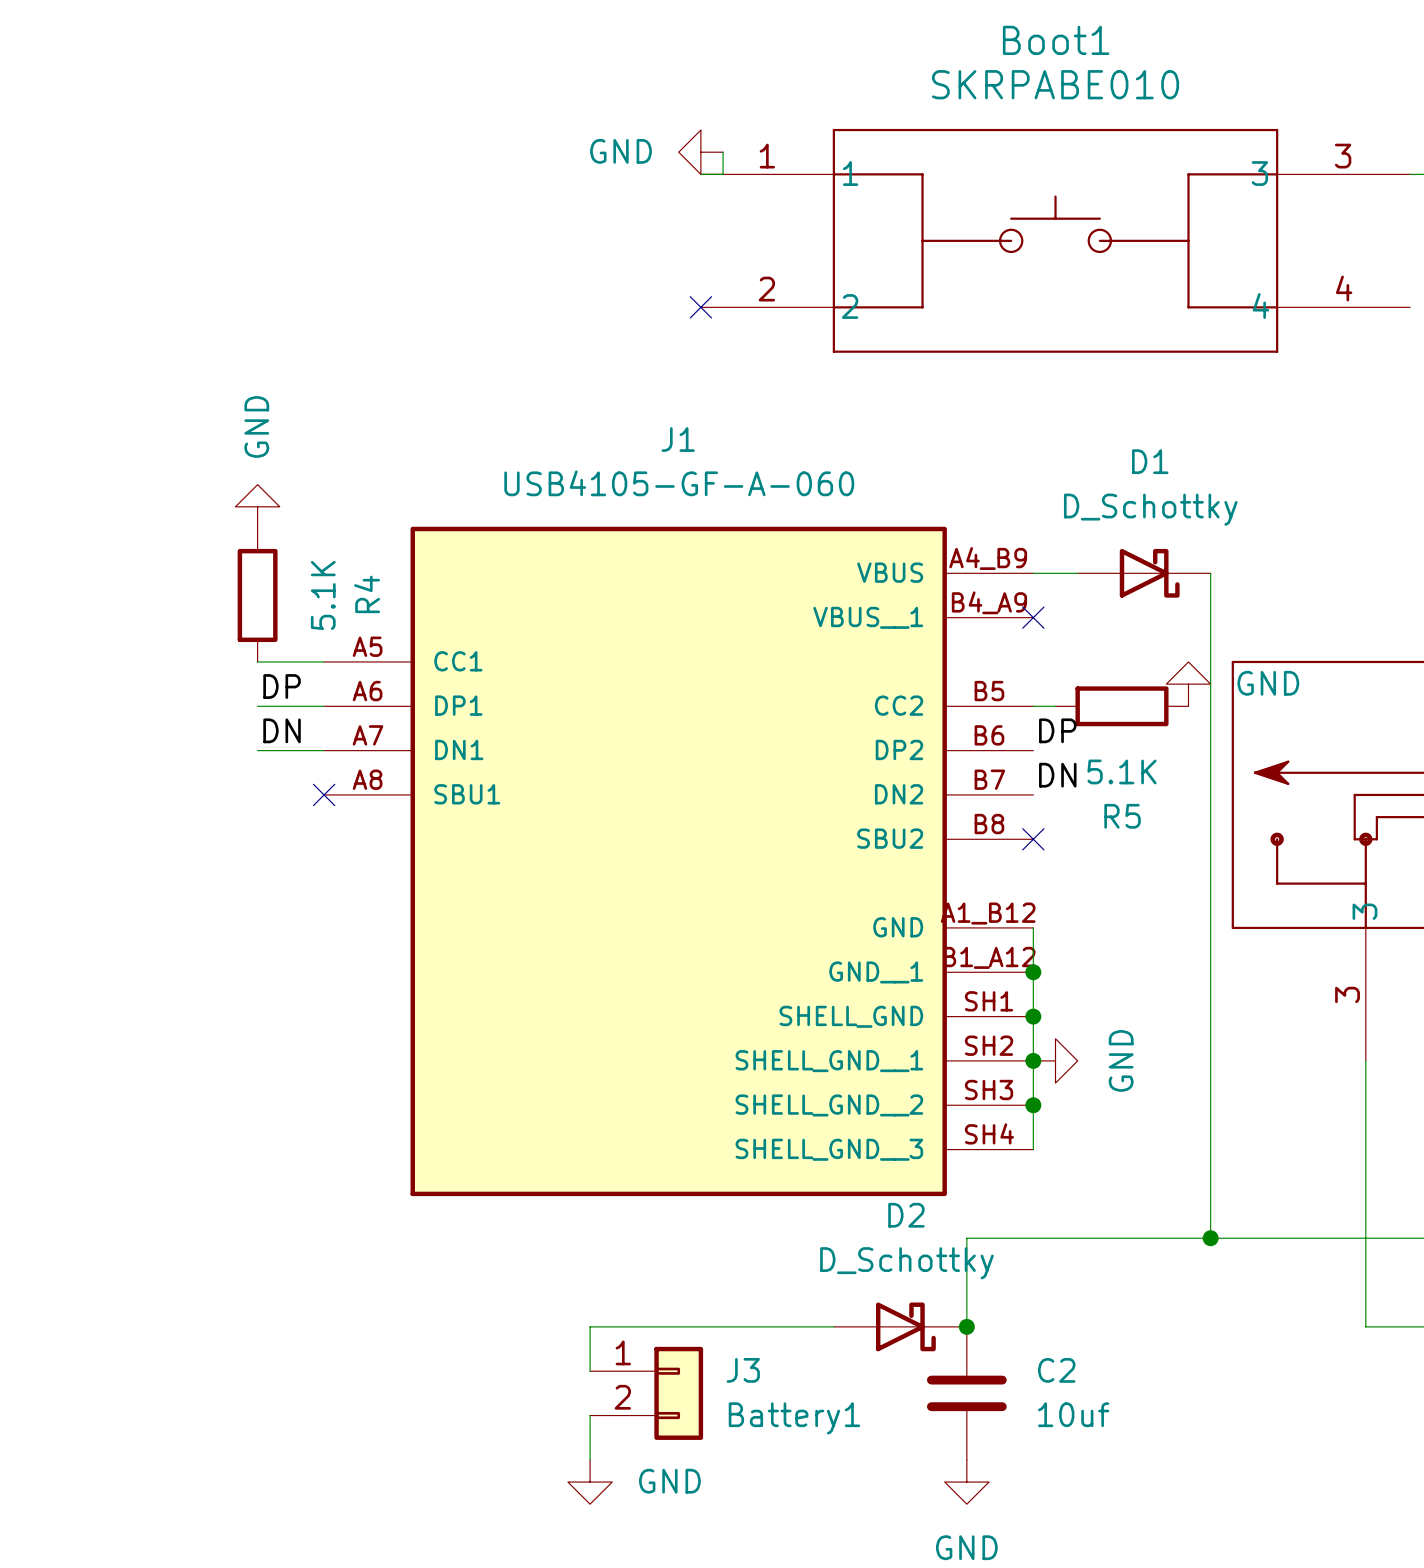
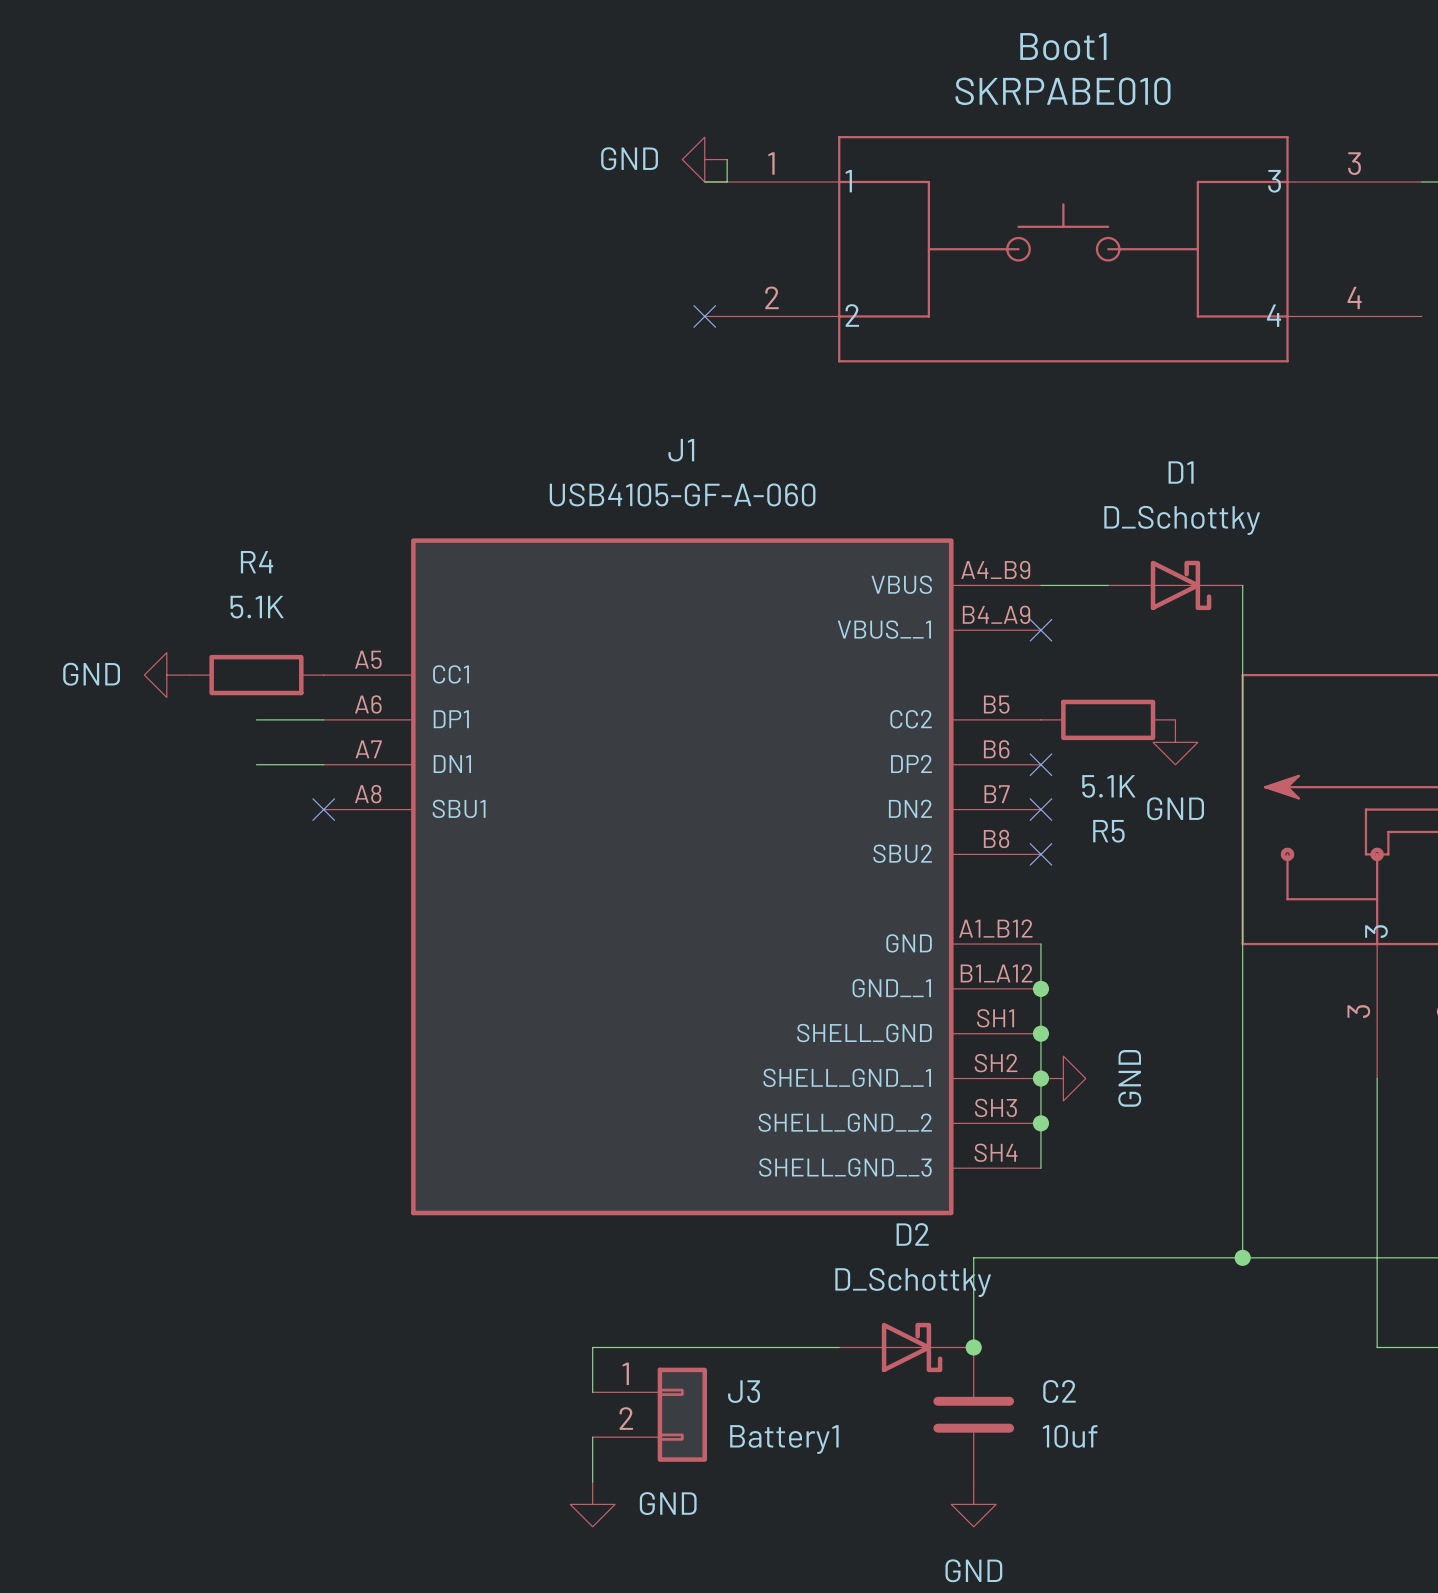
power symbol rotation: 0° (257, 506) -> 90° counterclockwise (166, 675)
power symbol position: GND (257, 506) -> GND (166, 675)
D1 position: (1144, 573) -> (1175, 585)
wire: (1210, 573) (1210, 1238) -> (1242, 585) (1242, 1257)
R4 name position: R4 (367, 594) -> R4 (257, 562)
R4 rotation: 0° (257, 595) -> 90° clockwise (256, 675)
R4 value position: 5.1K (323, 595) -> 5.1K (257, 607)
wire: (257, 661) (324, 661) -> none
power symbol text position: GND (1268, 683) -> GND (1175, 808)
power symbol rotation: 0° (1188, 684) -> 180° (1175, 742)
power symbol position: GND (1188, 684) -> GND (1175, 742)
label: DP (282, 686) -> none
R5 position: (1122, 706) -> (1108, 719)
label: DN (282, 730) -> none
label: DP (1057, 730) -> none
no-connect mark: none -> (1040, 764)
label: DN (1057, 775) -> none
no-connect mark: none -> (1040, 809)
junction position: (1210, 1238) -> (1242, 1257)

